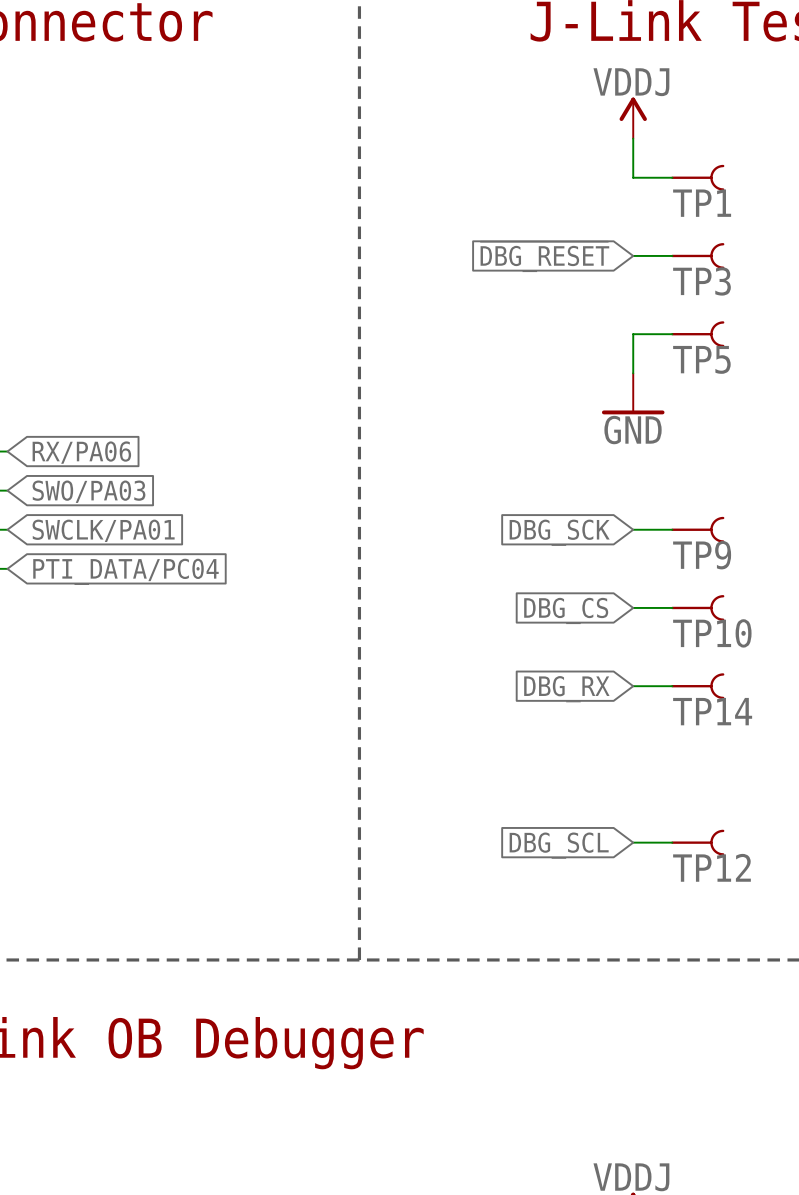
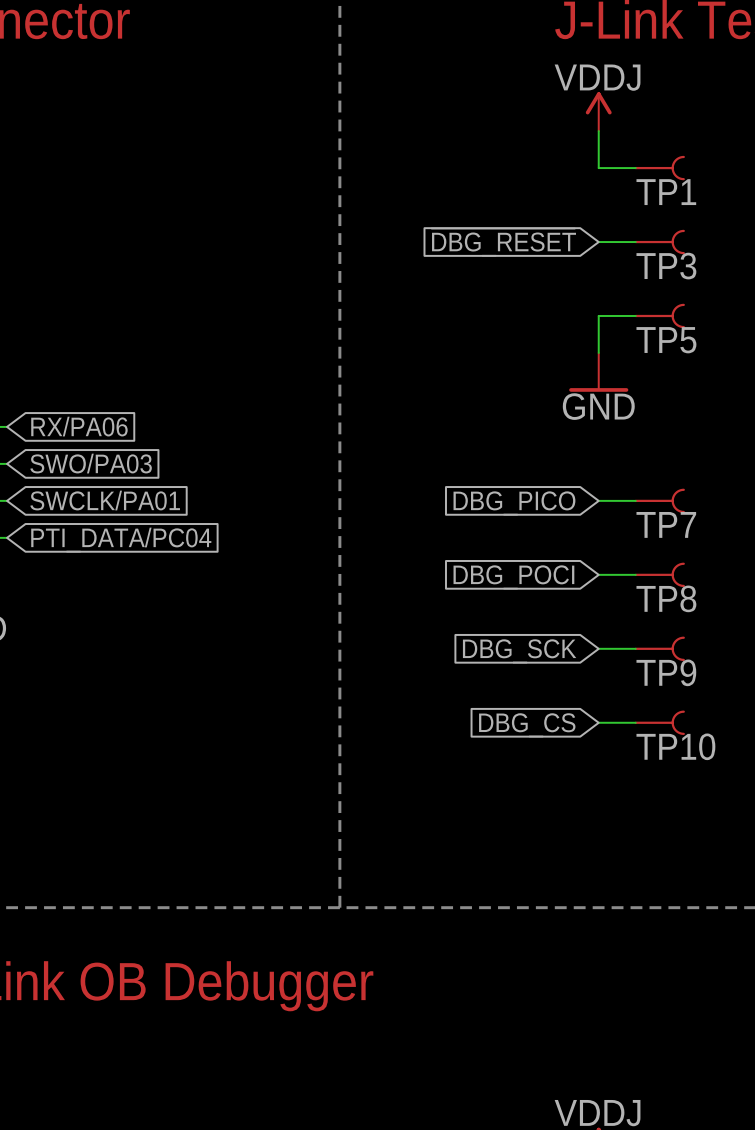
global label: DBG_SCK (559, 532) -> DBG_PICO (514, 503)
TP9 name: TP9 (702, 555) -> TP7 (666, 524)
global label: DBG_CS (566, 610) -> DBG_POCI (513, 577)
TP10 name: TP10 (712, 633) -> TP8 (666, 598)
global label: DBG_RX (566, 689) -> DBG_SCK (519, 651)
TP14 name: TP14 (712, 711) -> TP9 (666, 672)
TP10: none -> (659, 722)
global label: none -> DBG_CS (527, 725)
wire: (633, 842) (672, 842) -> (598, 722) (635, 722)
TP12: (697, 842) -> none
global label: DBG_SCL (559, 845) -> none

